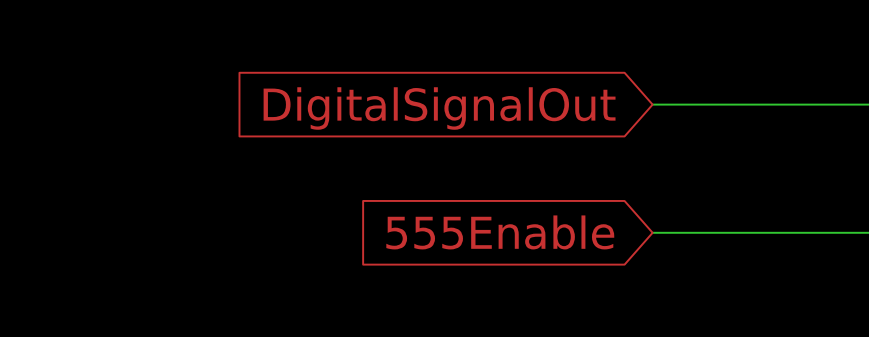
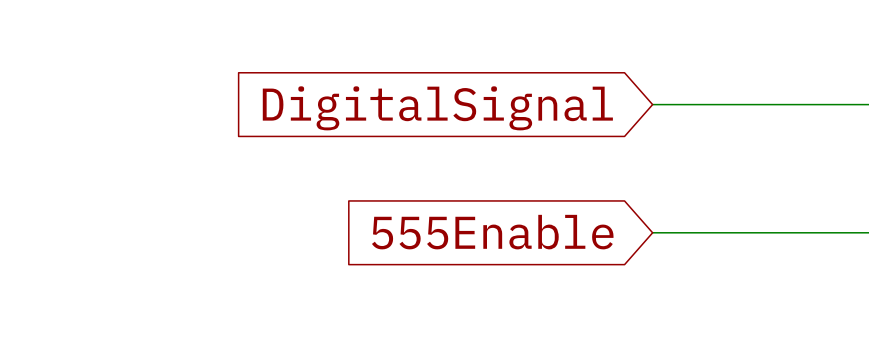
global label: DigitalSignalOut (439, 108) -> DigitalSignal (437, 108)

